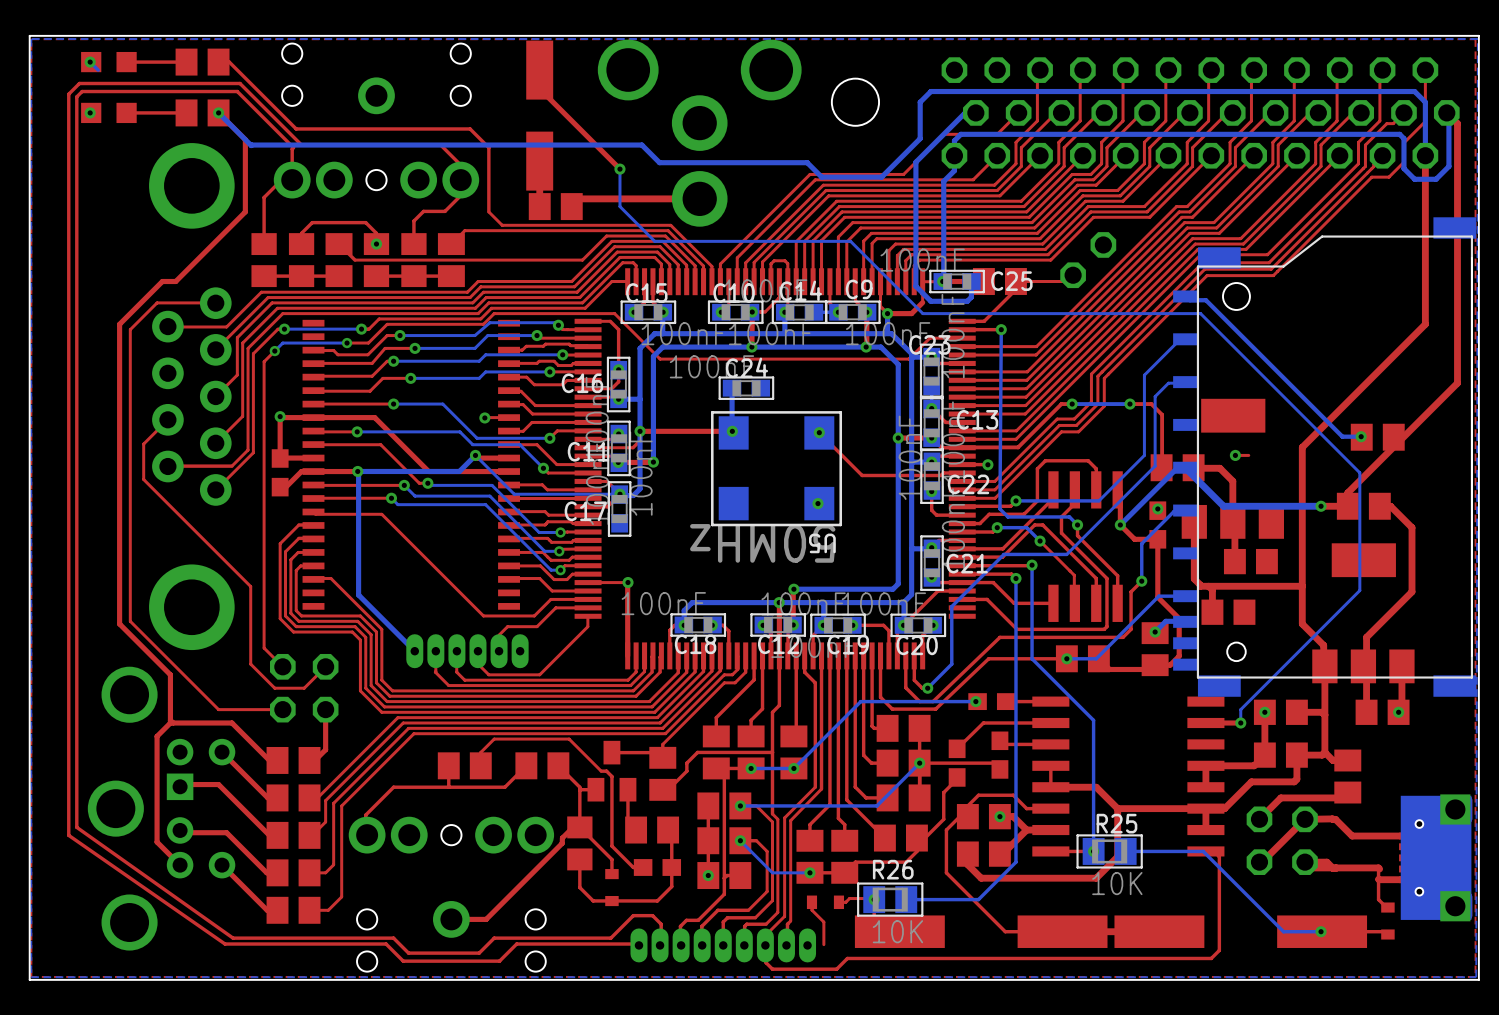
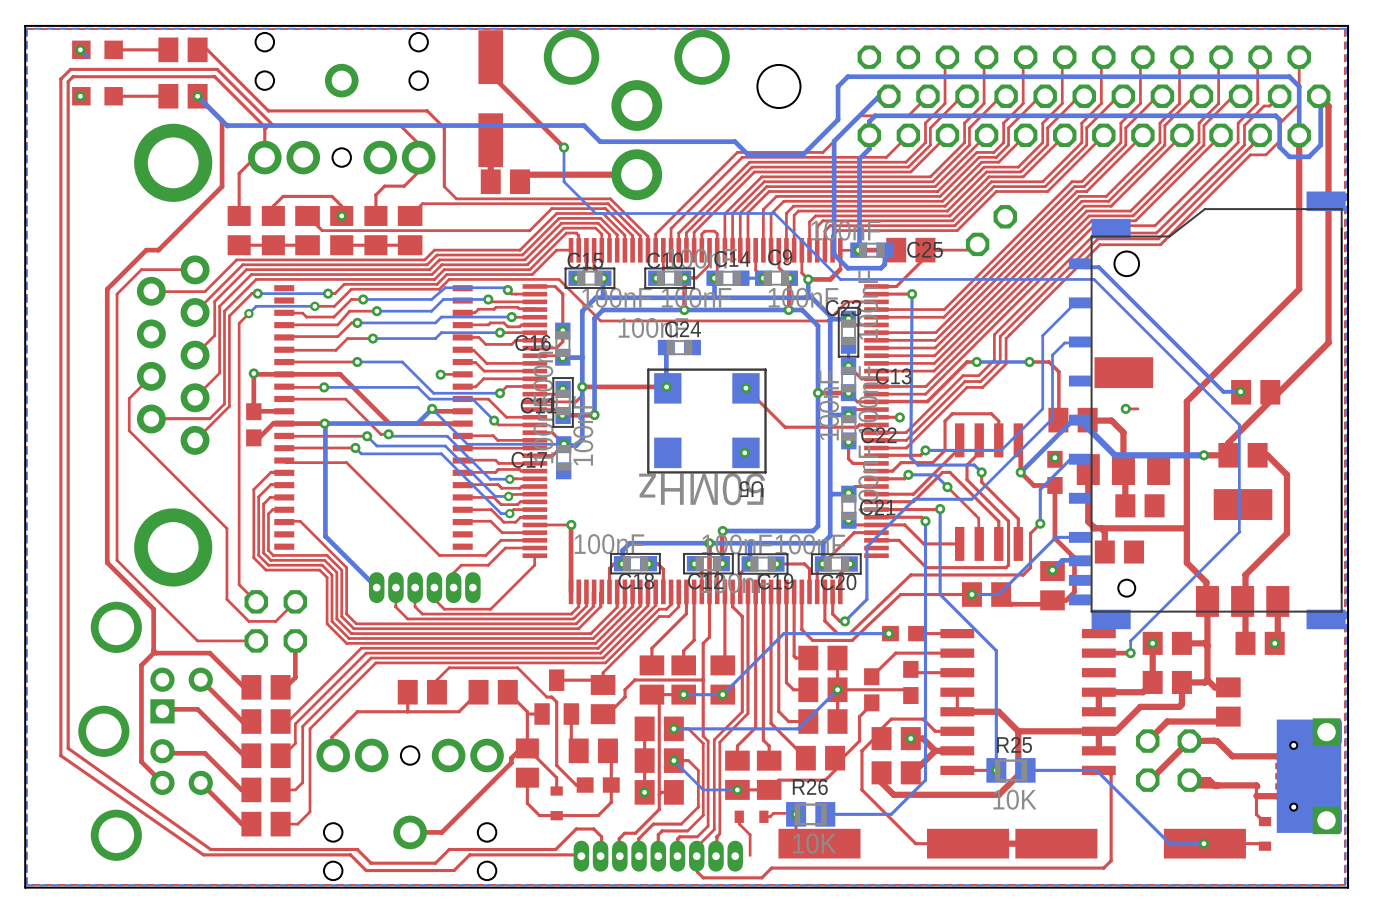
C25 footprint: [929, 269, 985, 294] -> [850, 242, 894, 258]
C14 footprint: [771, 300, 828, 325] -> [706, 270, 750, 286]
C9 footprint: [824, 300, 881, 325] -> [754, 270, 799, 286]
C16 footprint: [606, 356, 631, 413] -> [555, 322, 571, 366]
C24 footprint: [718, 376, 775, 400] -> [657, 339, 701, 356]
C13 footprint: [919, 395, 944, 452] -> [840, 358, 857, 402]
C22 footprint: [920, 448, 944, 504] -> [841, 406, 857, 450]
C17 footprint: [607, 481, 632, 537] -> [556, 436, 572, 480]
C21 footprint: [920, 535, 944, 591] -> [841, 485, 857, 529]
R25 footprint: [1076, 834, 1143, 869] -> [986, 758, 1036, 783]
R26 footprint: [857, 882, 924, 917] -> [786, 802, 836, 827]

